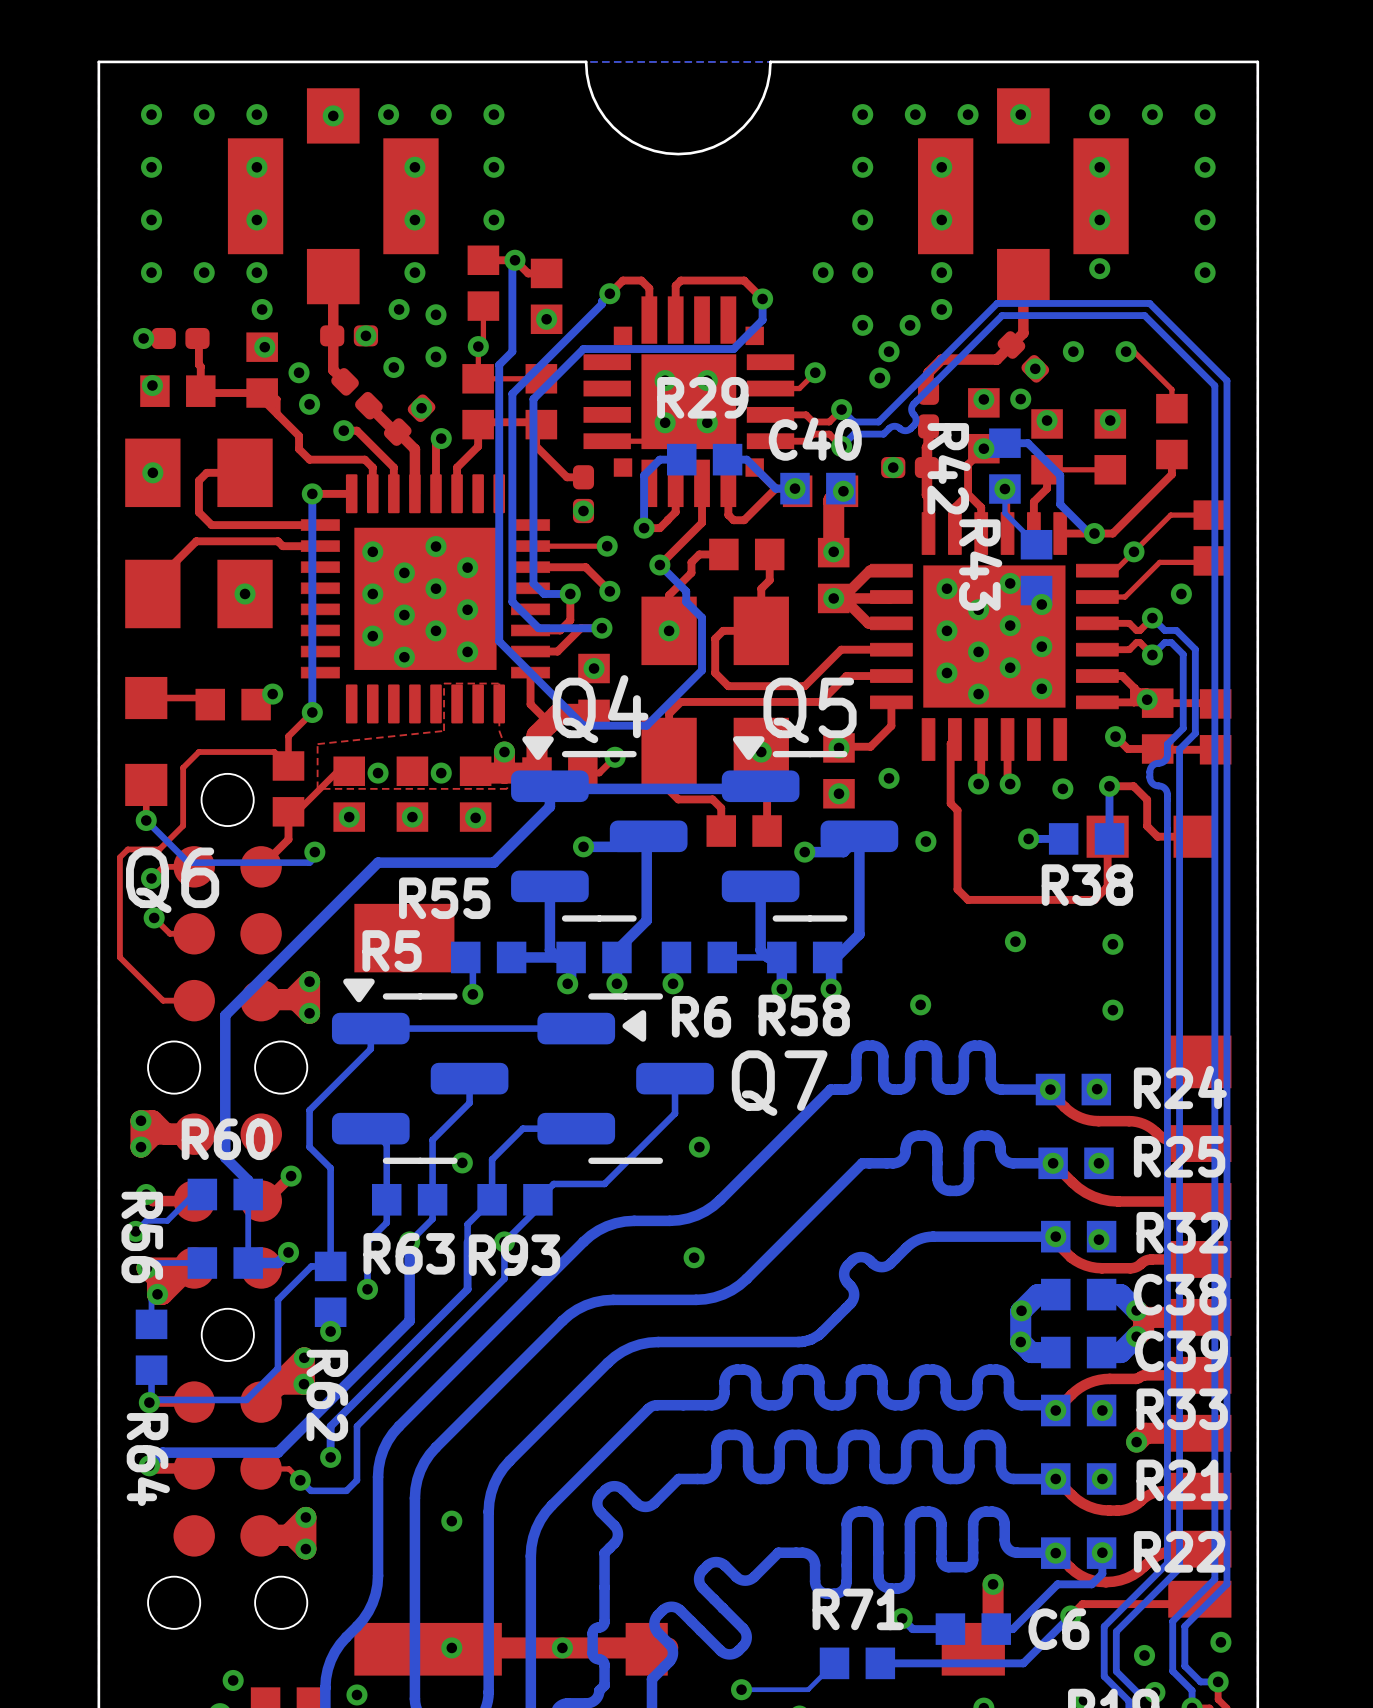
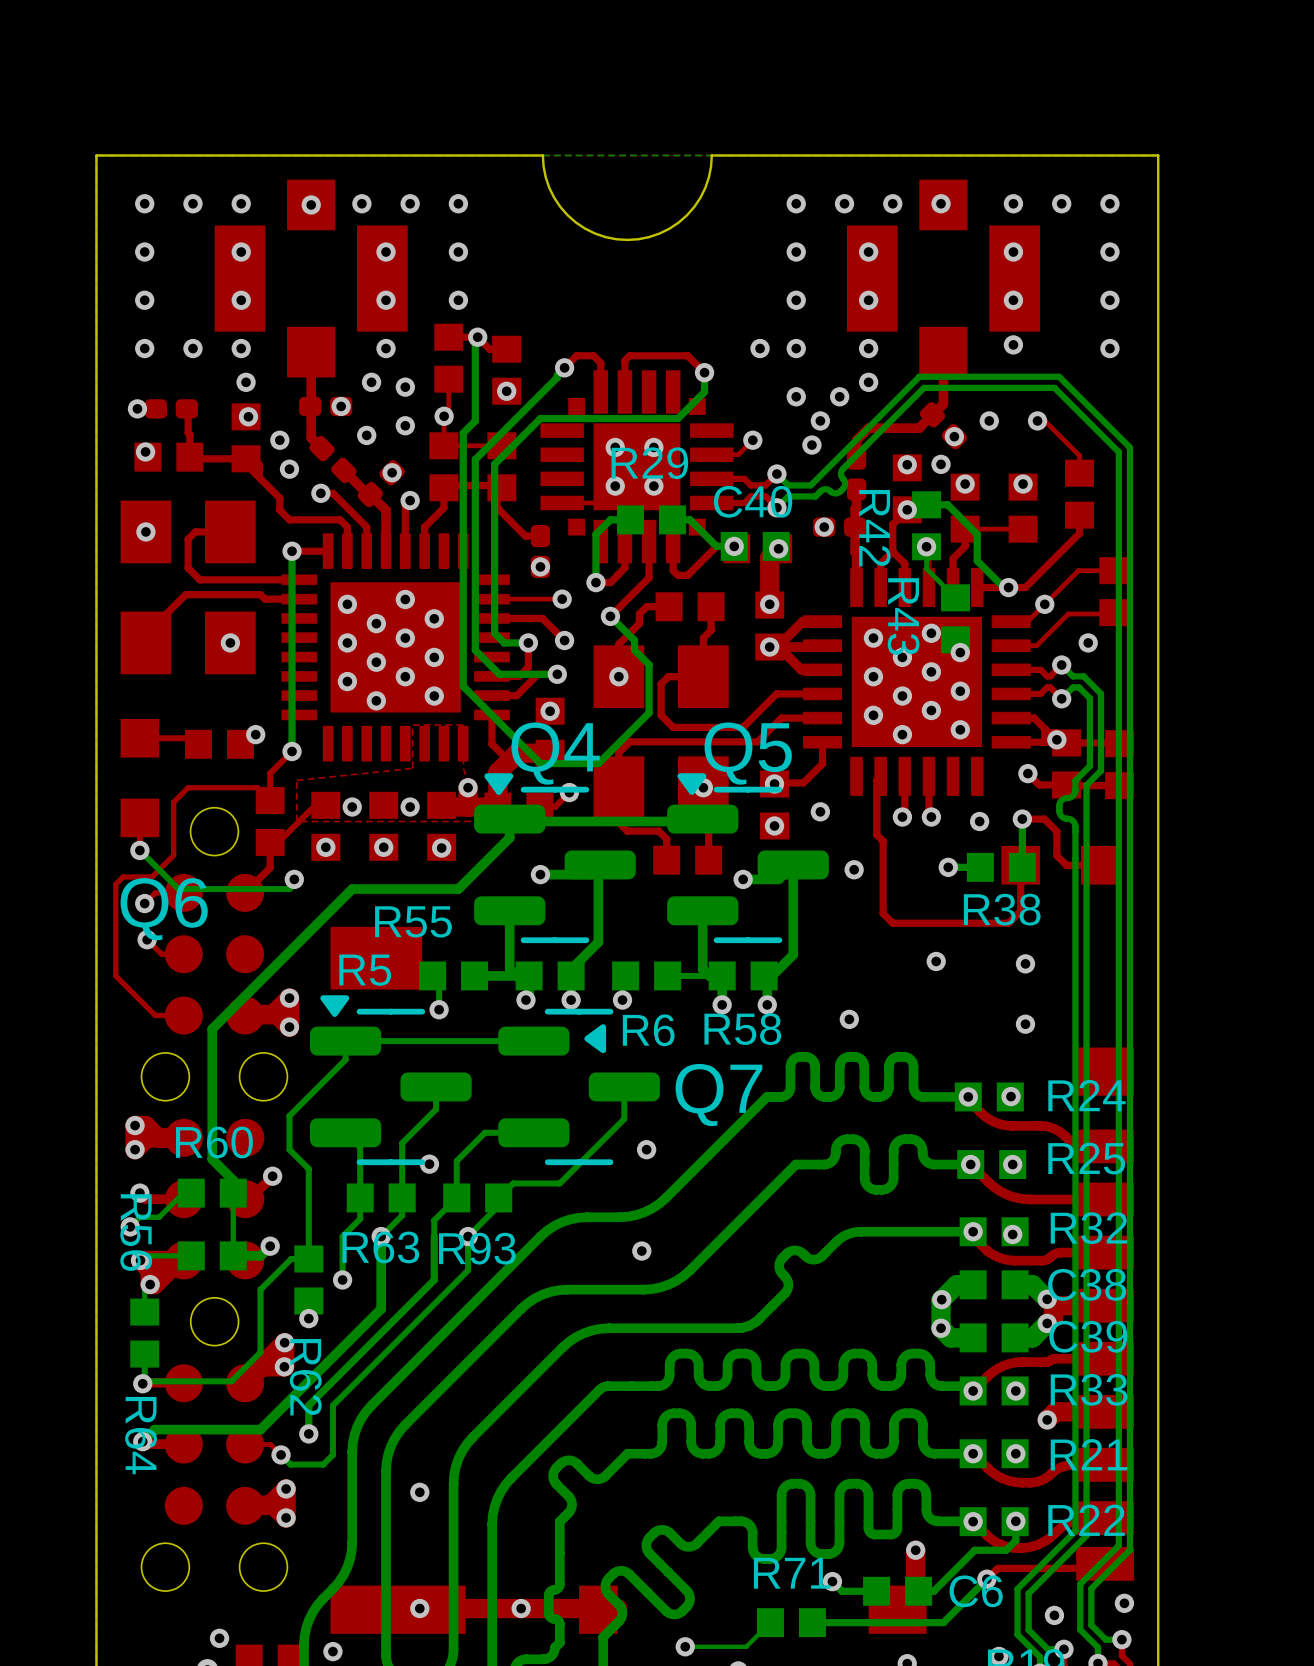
Q7 footprint: [537, 993, 714, 1164] -> [498, 1008, 660, 1166]

